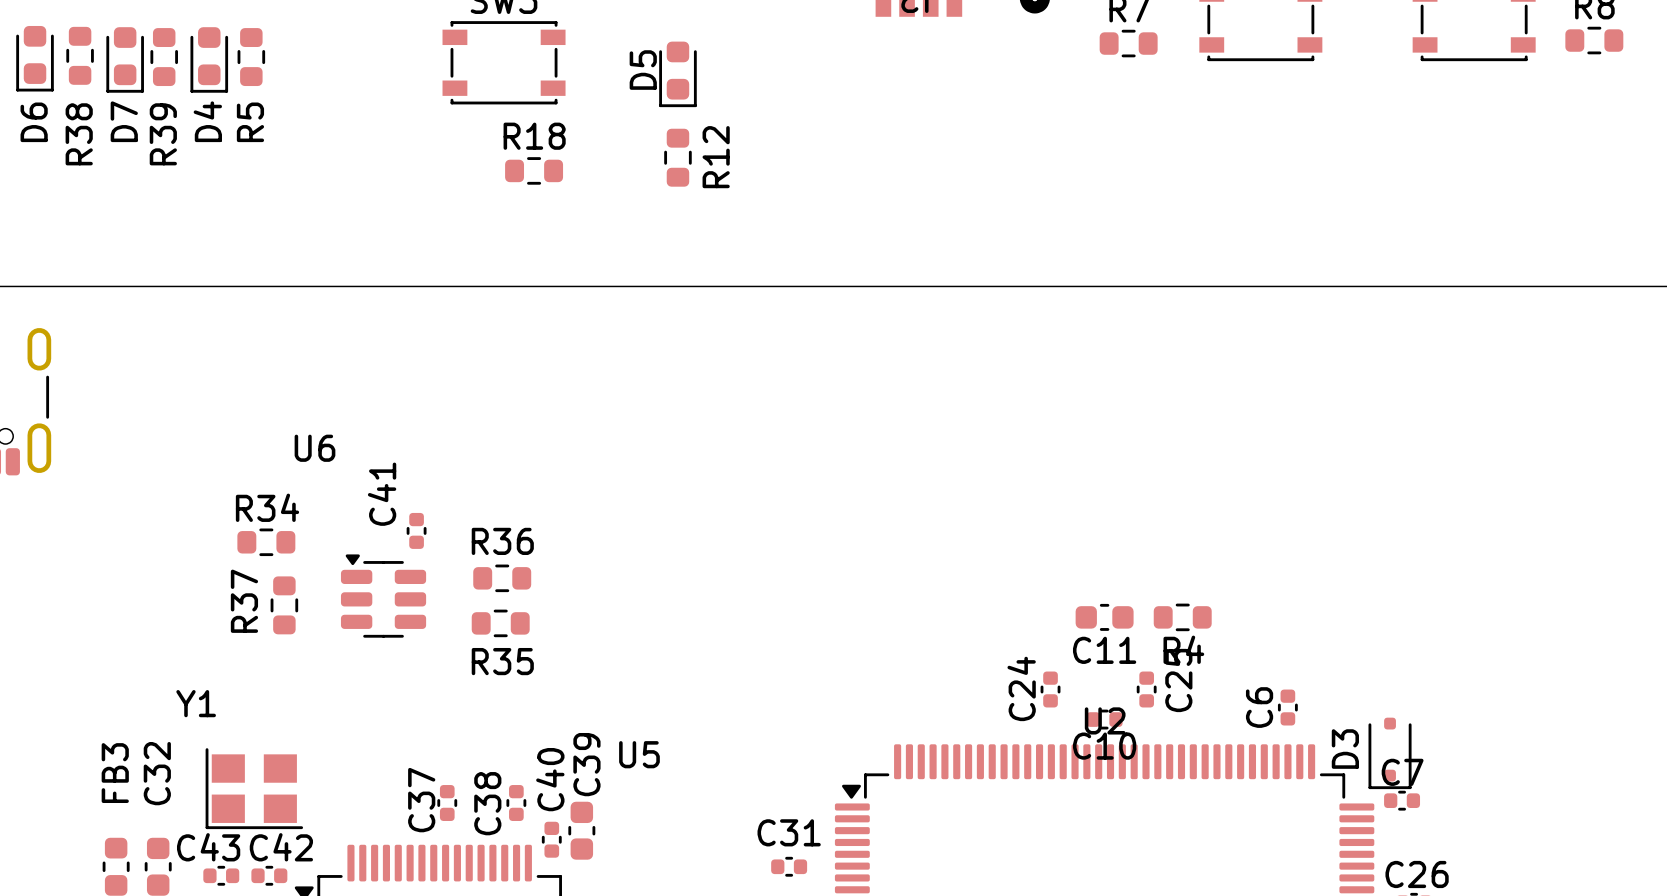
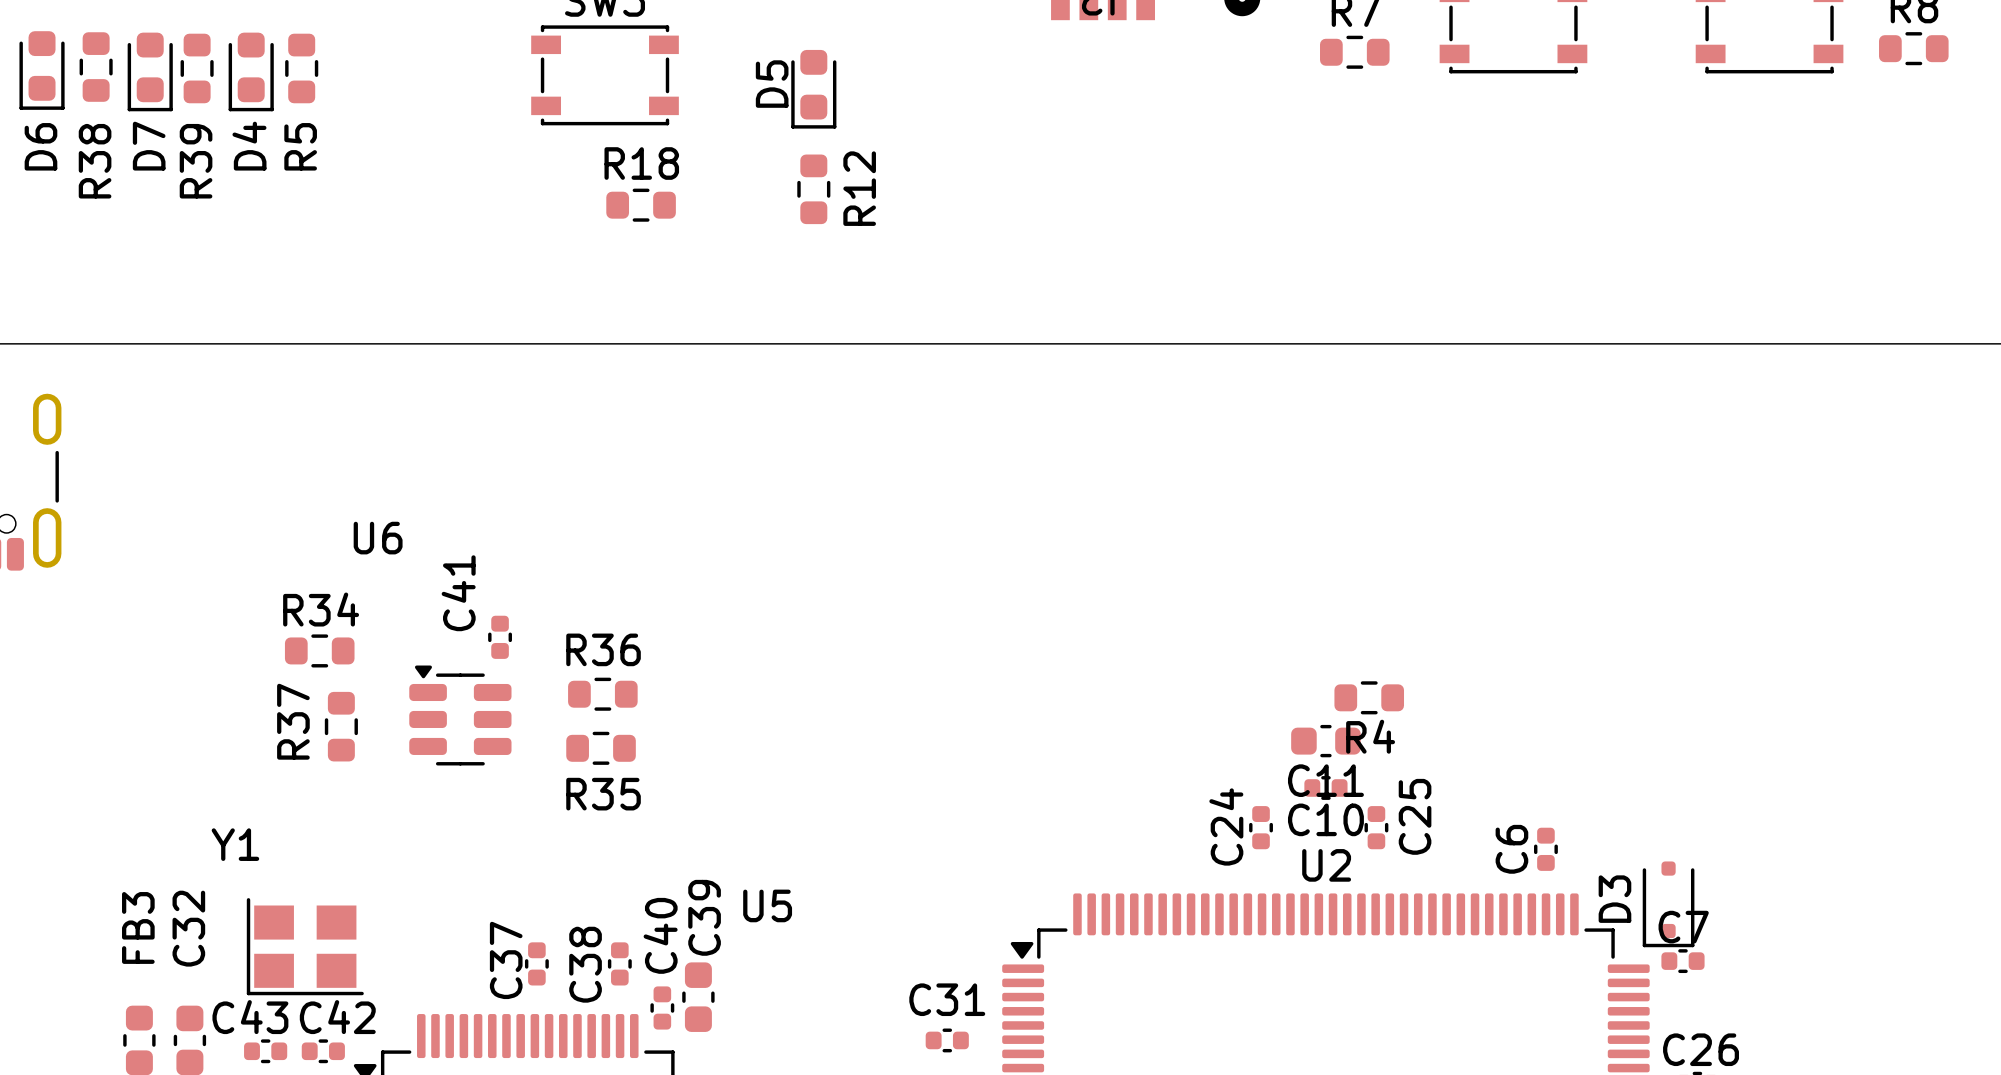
R4 position: (1182, 617) -> (1369, 697)
C10 position: (1104, 719) -> (1325, 787)

